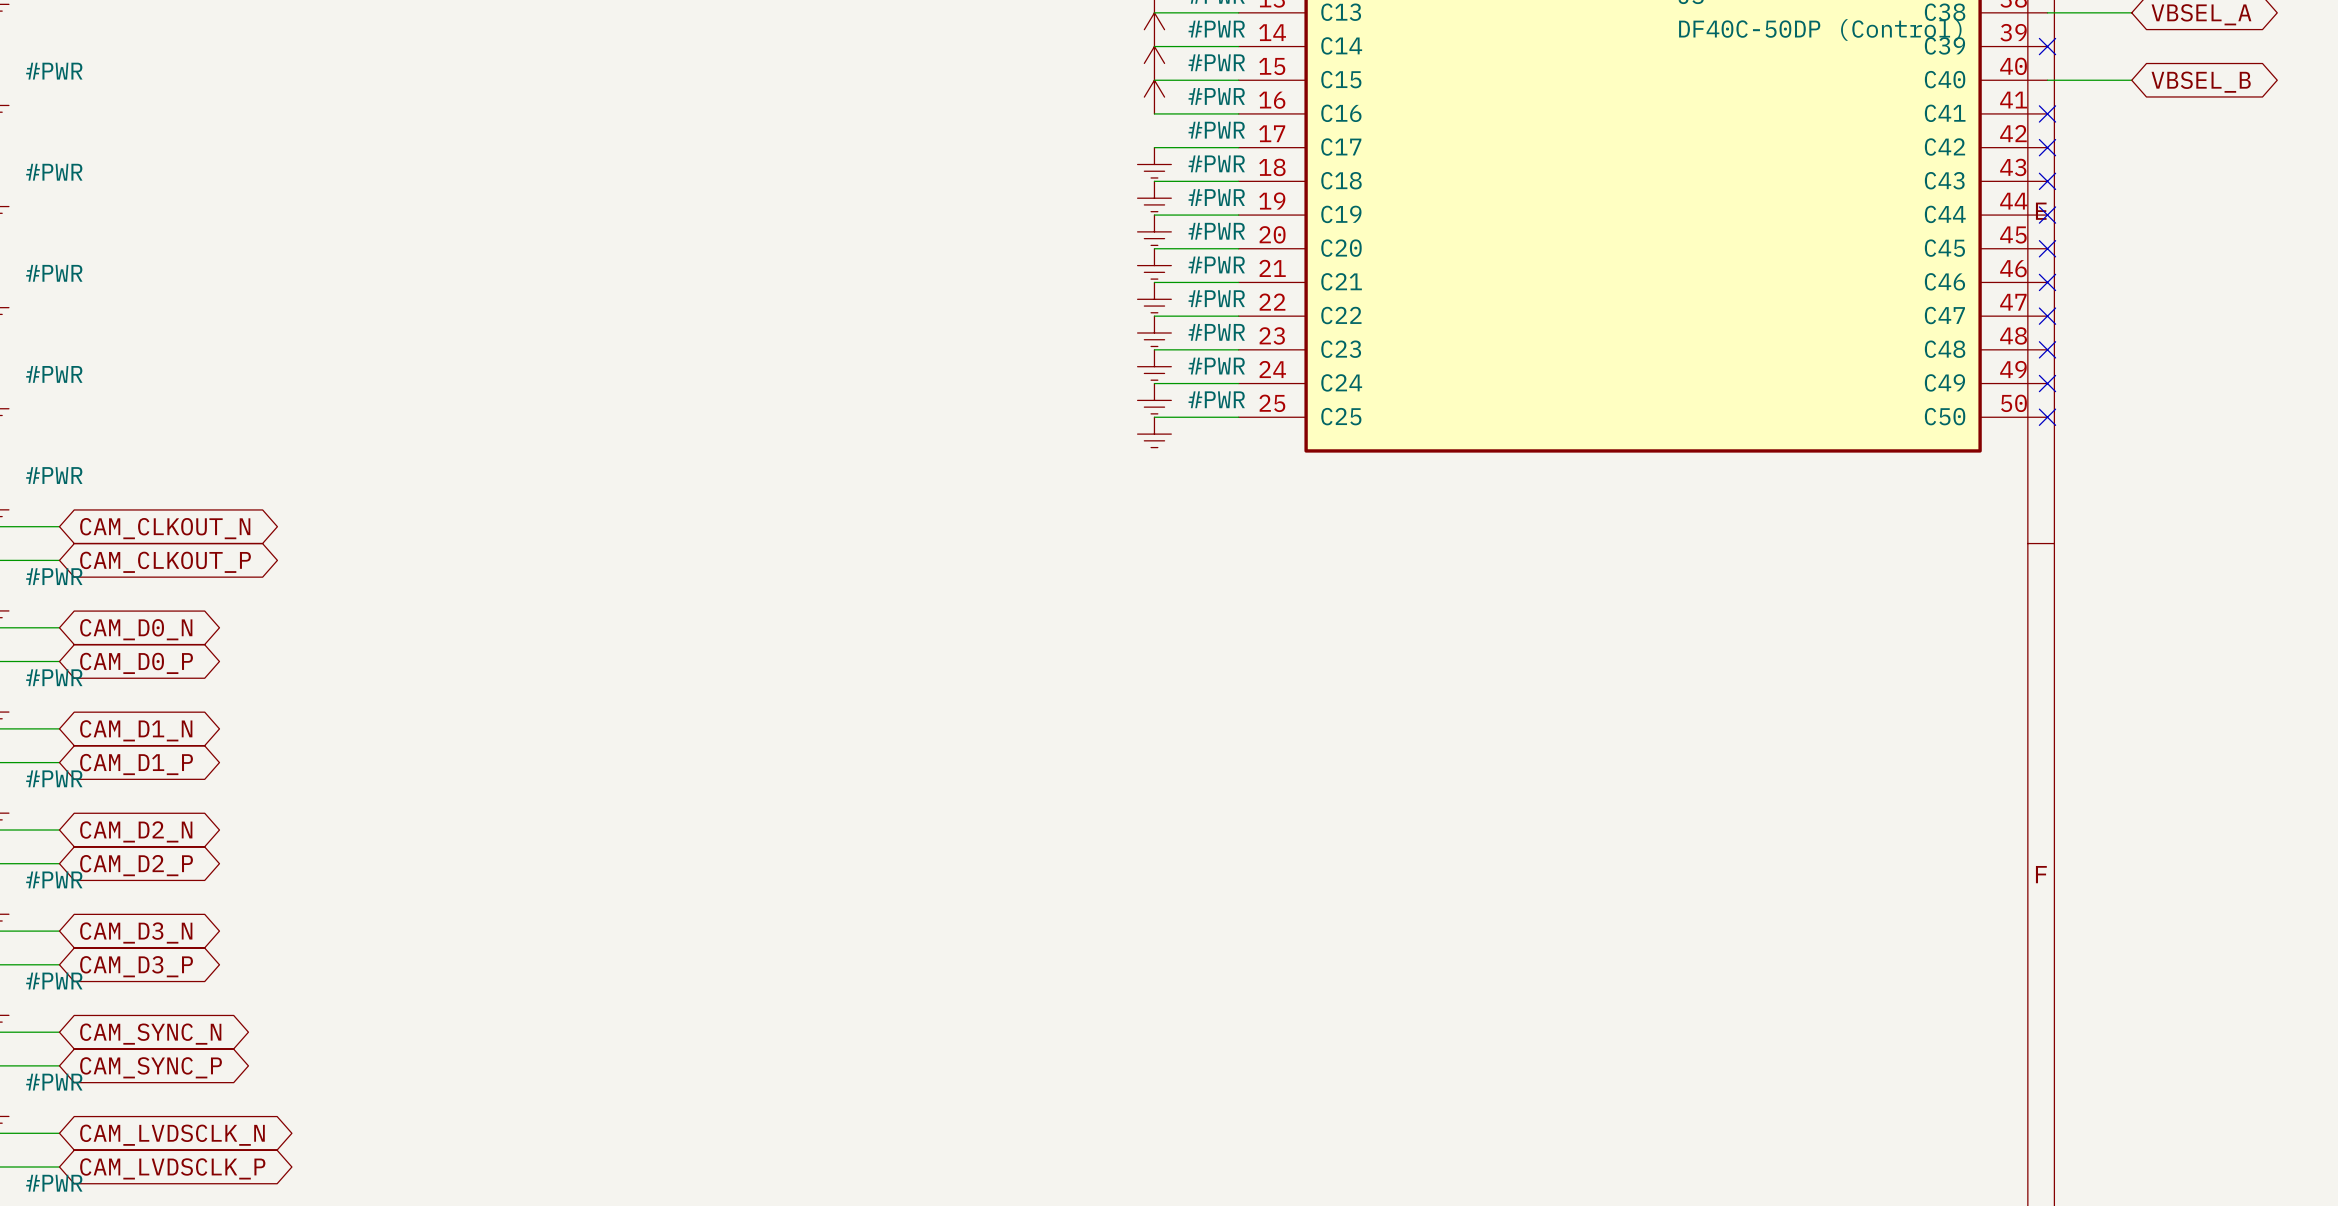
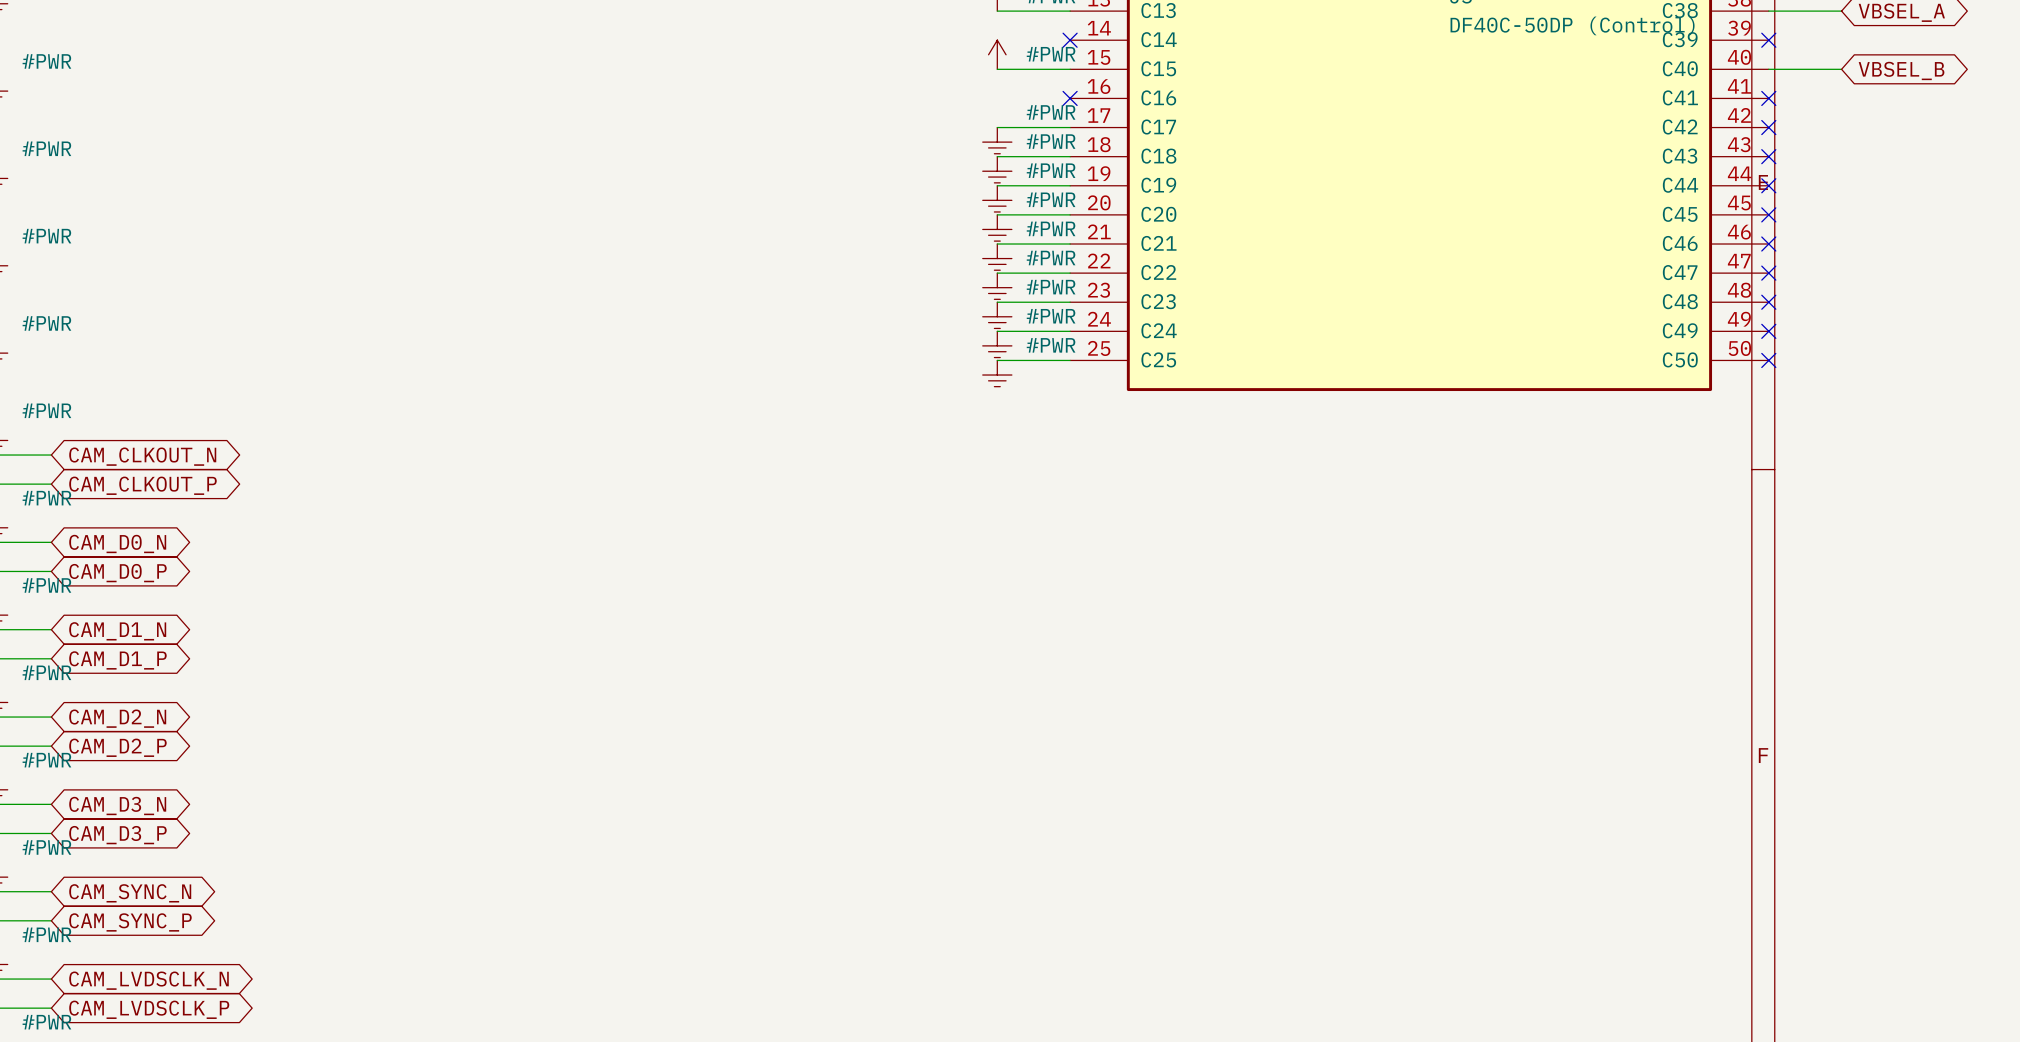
#PWR: (1154, 29) -> none
wire: (1154, 46) (1238, 46) -> none
no-connect mark: none -> (1070, 40)
#PWR: (1154, 97) -> none
wire: (1154, 113) (1238, 113) -> none
no-connect mark: none -> (1070, 98)

